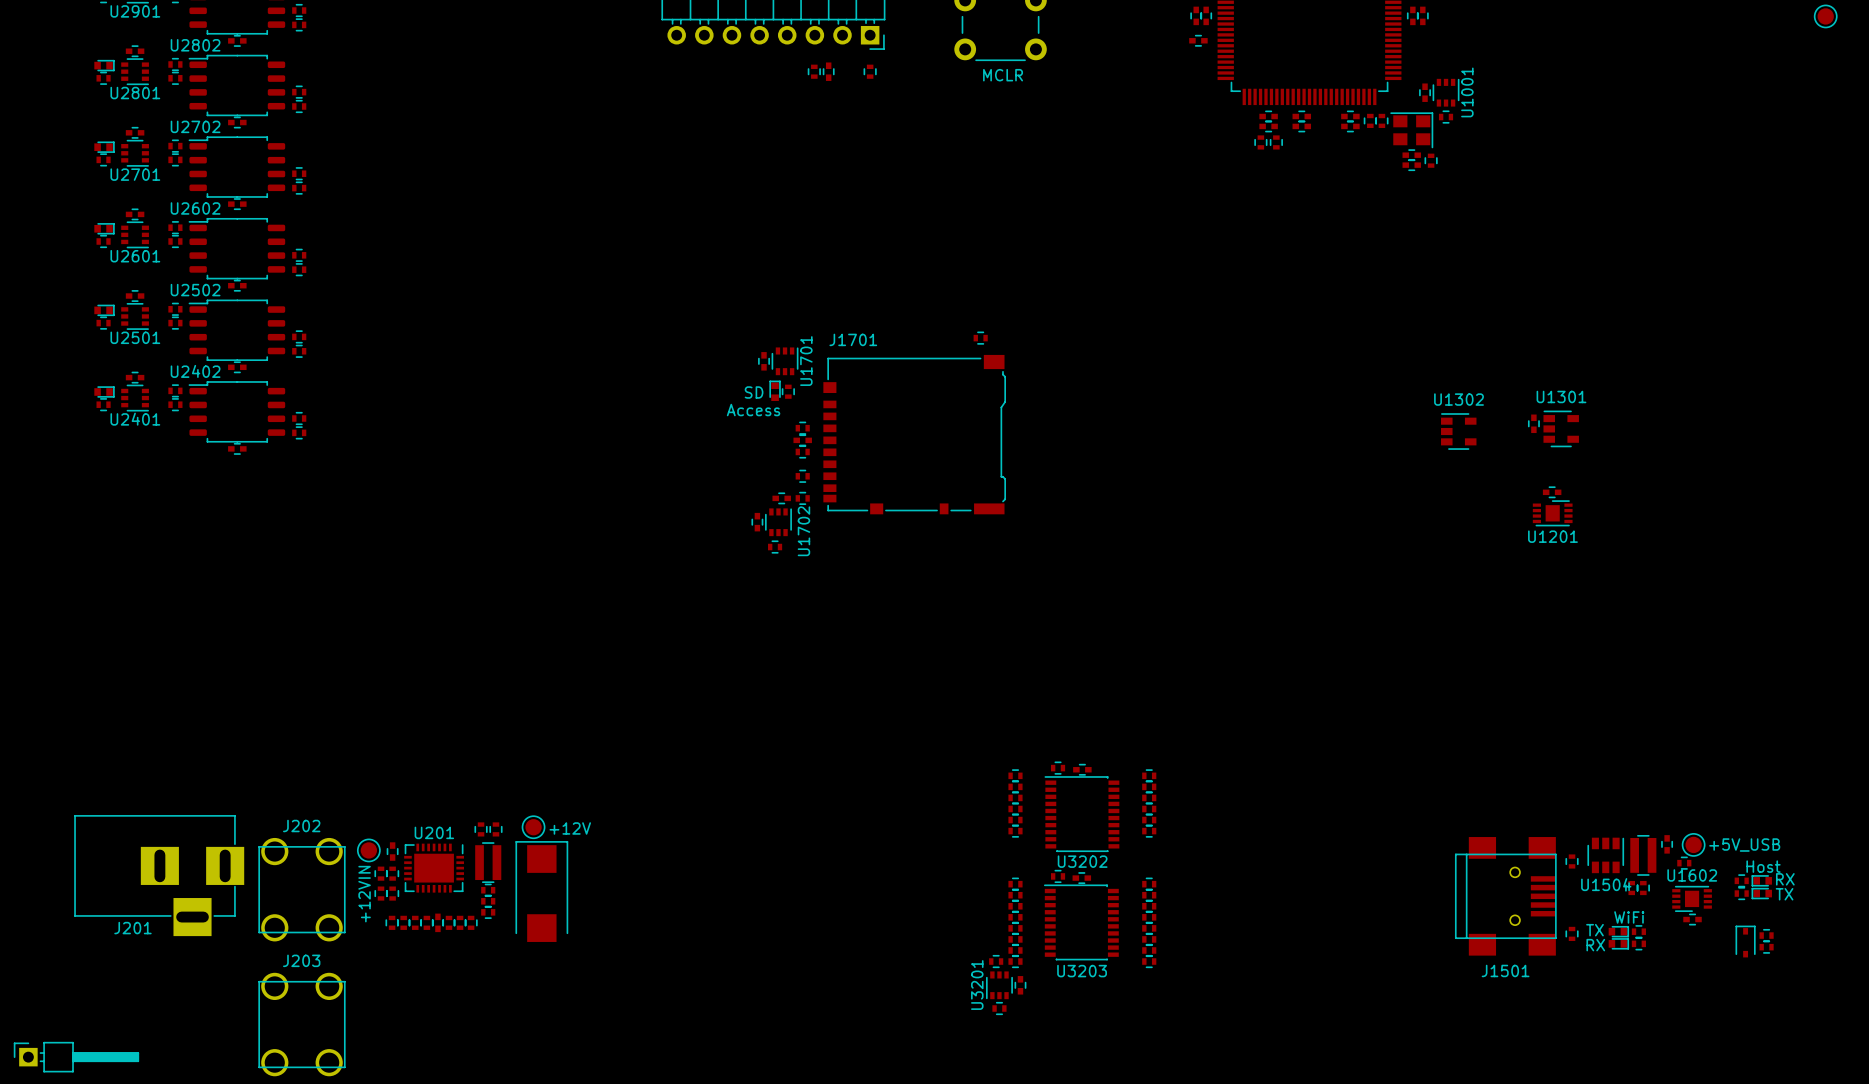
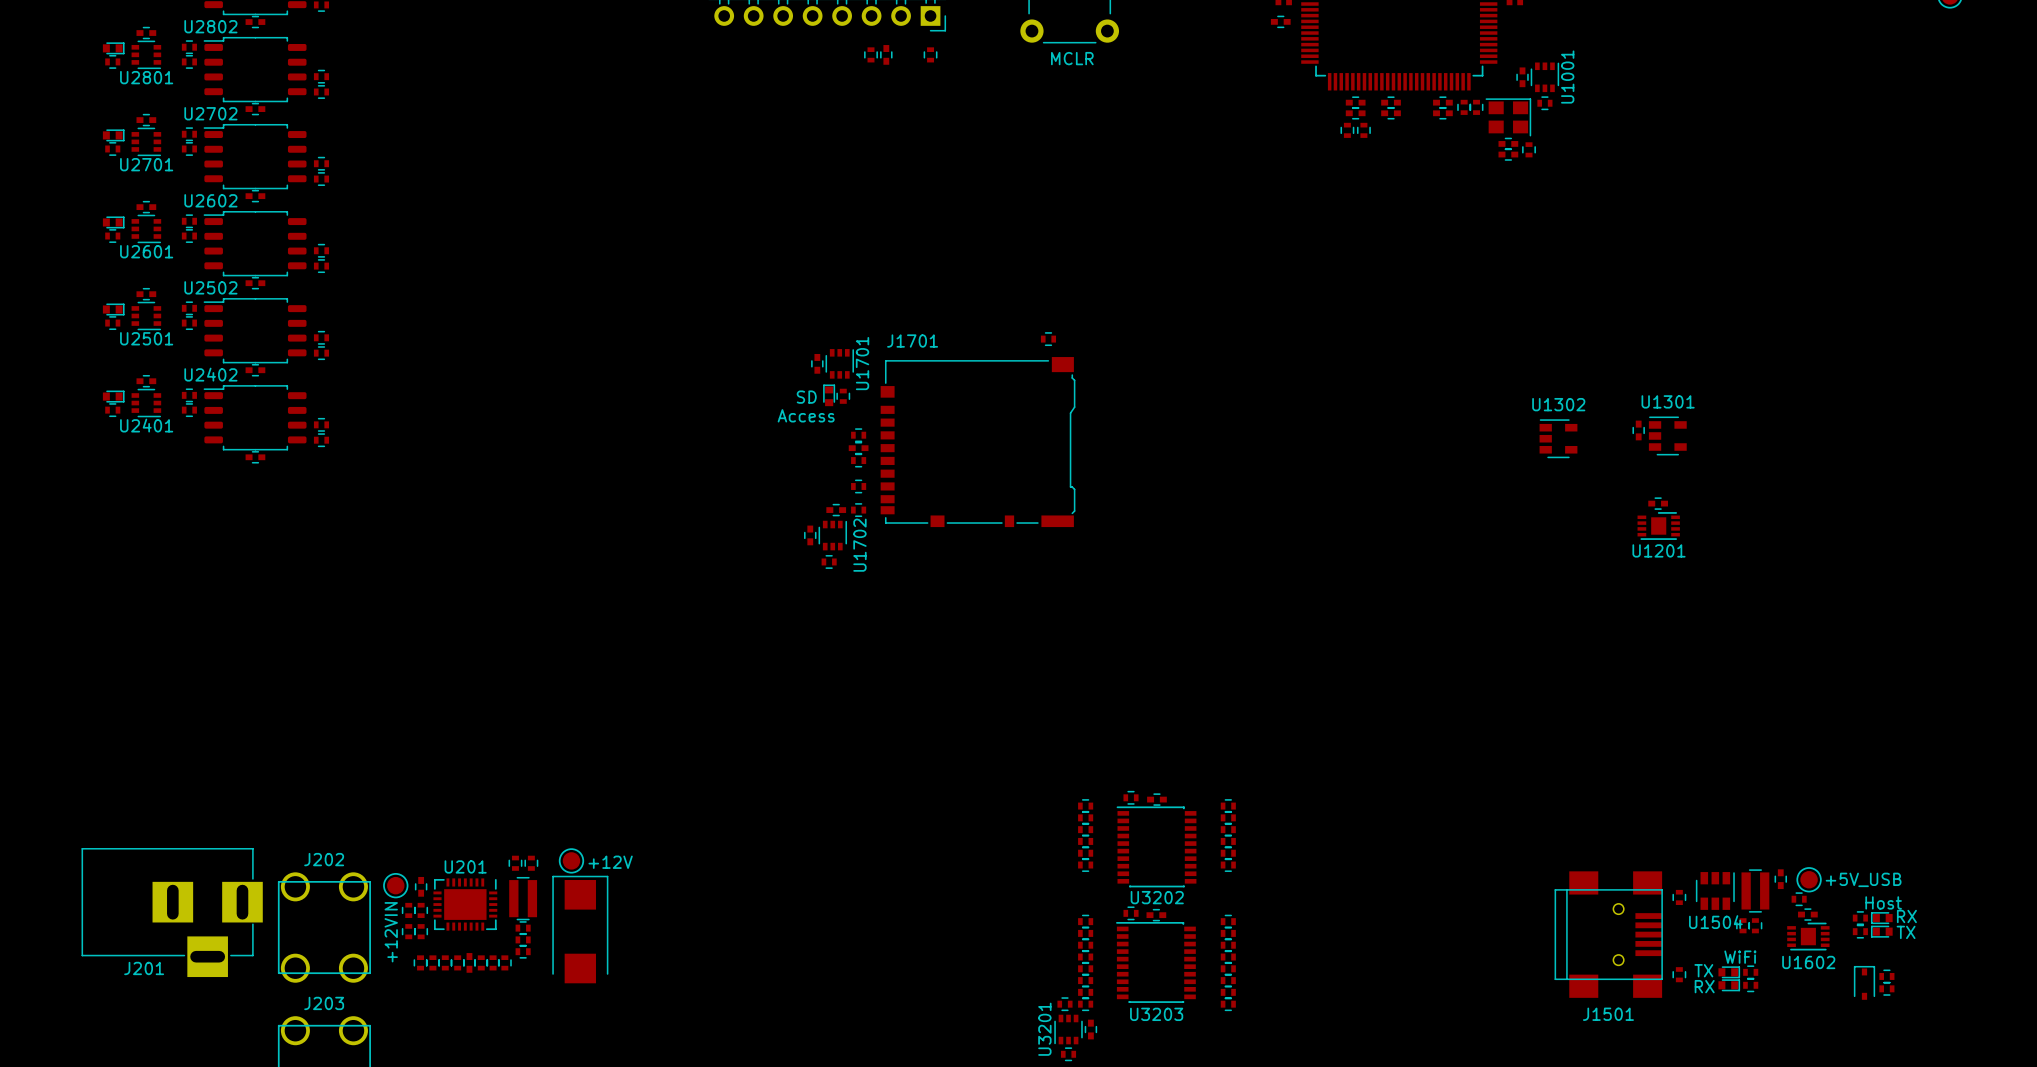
U1602 rotation: 0° (1692, 898) -> 180° (1808, 936)
part position: (1692, 919) -> (1807, 914)

